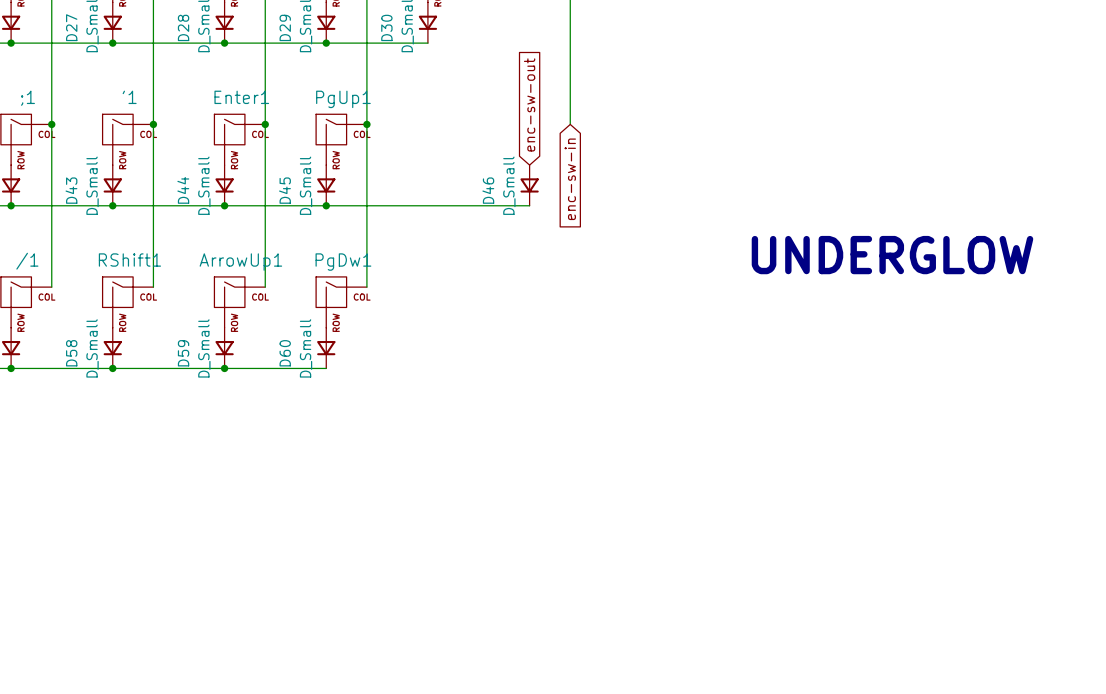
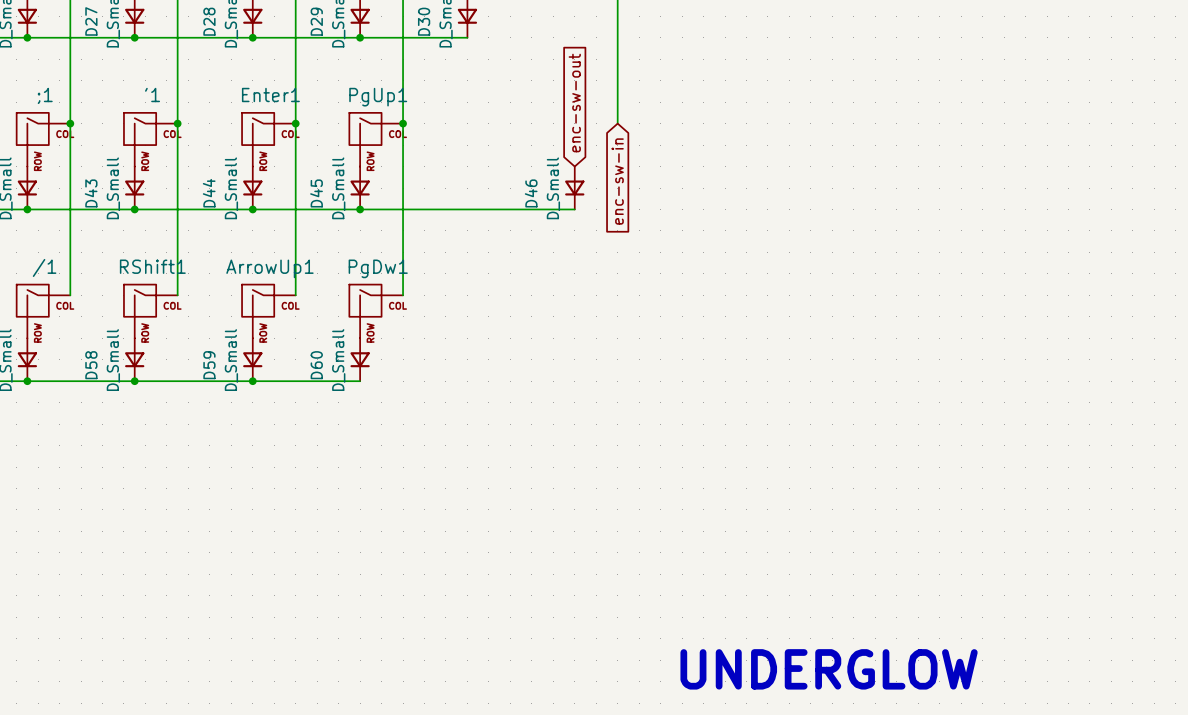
text: UNDERGLOW (892, 255) -> none
text: none -> UNDERGLOW (829, 669)

